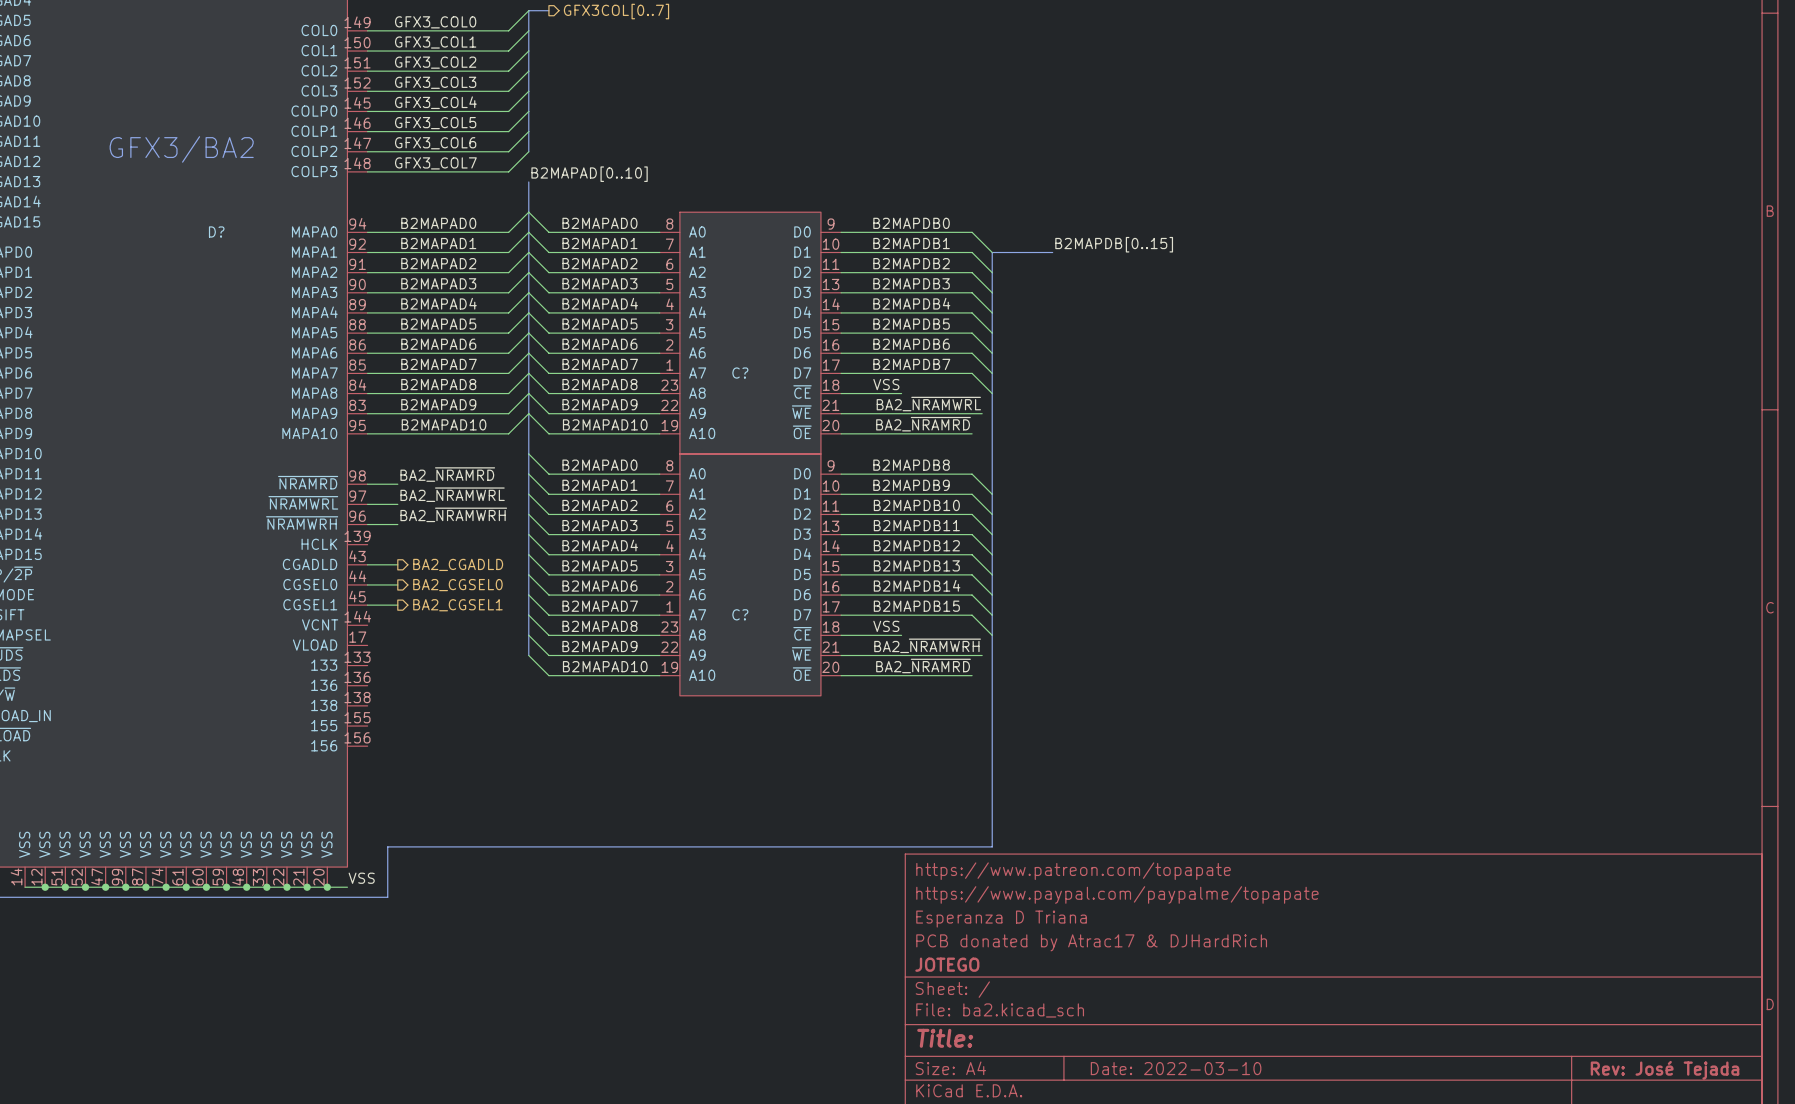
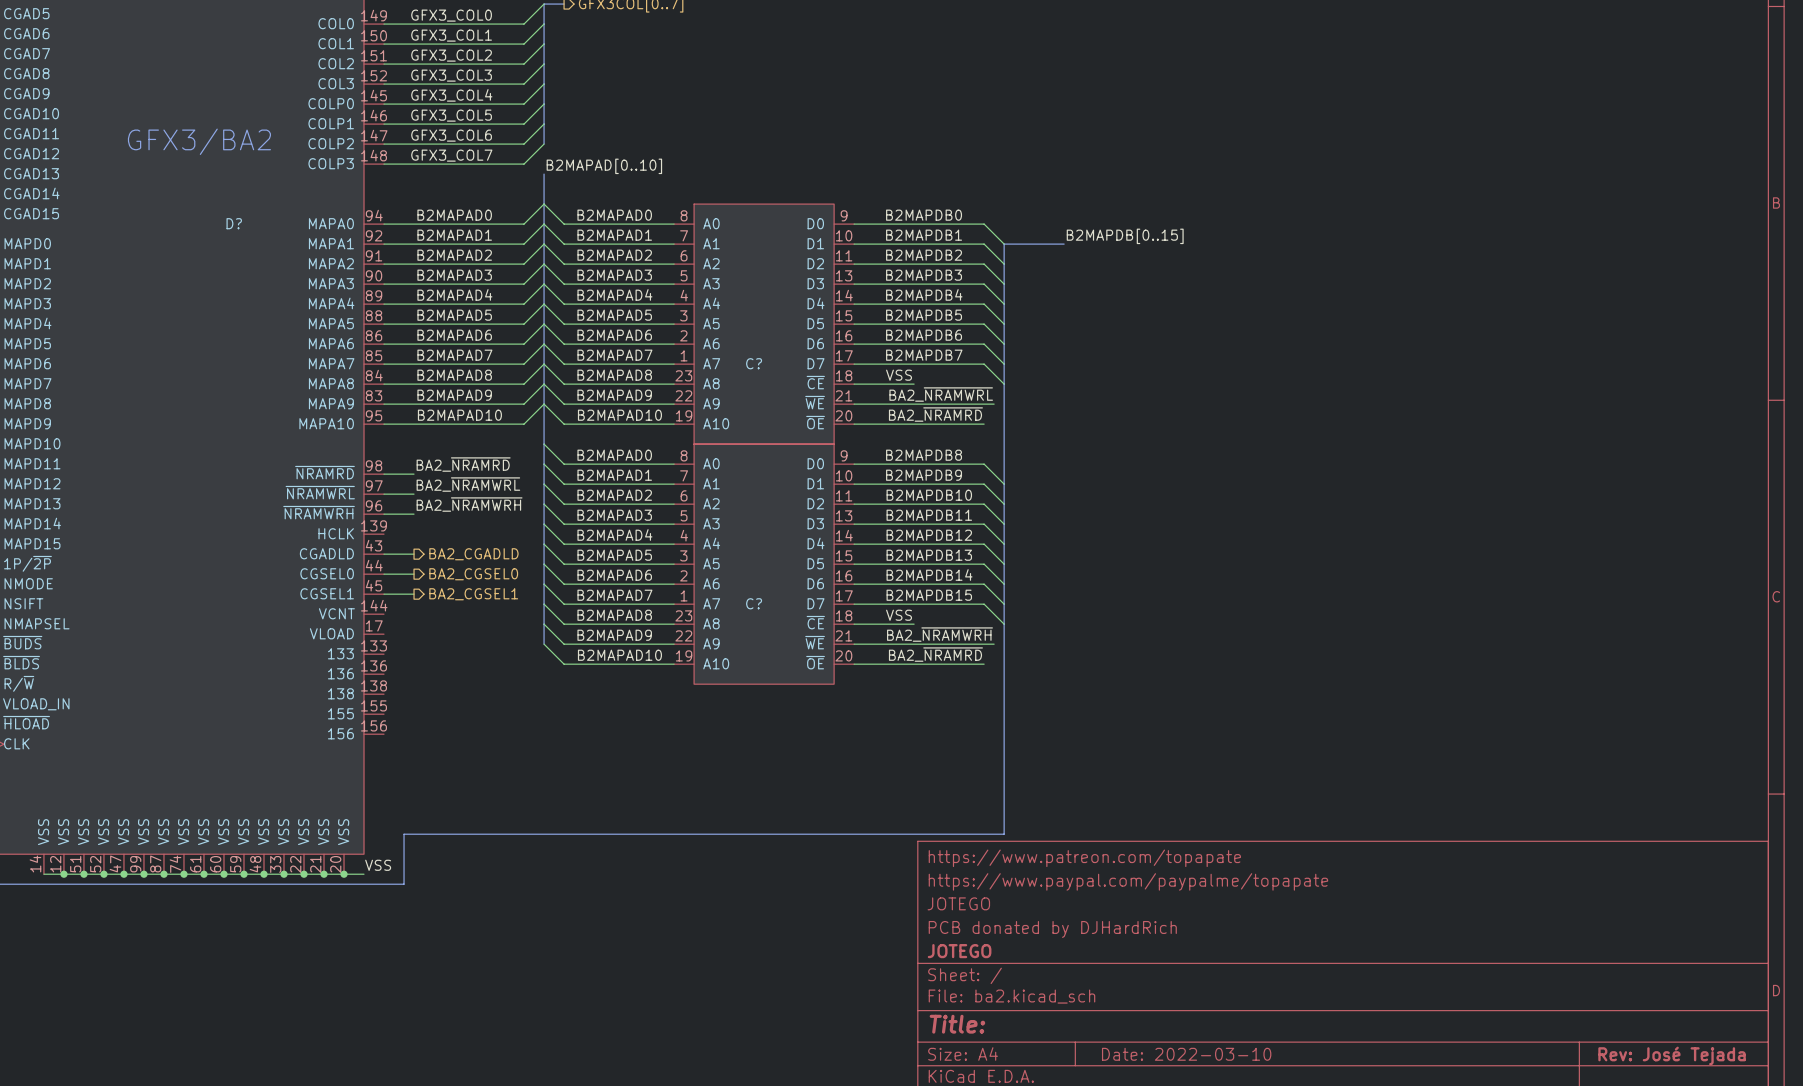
title block: Esperanza D Triana (1001, 919) -> JOTEGO (958, 903)
title block: PCB donated by Atrac17 & DJHardRich (1091, 942) -> PCB donated by DJHardRich (1052, 929)

